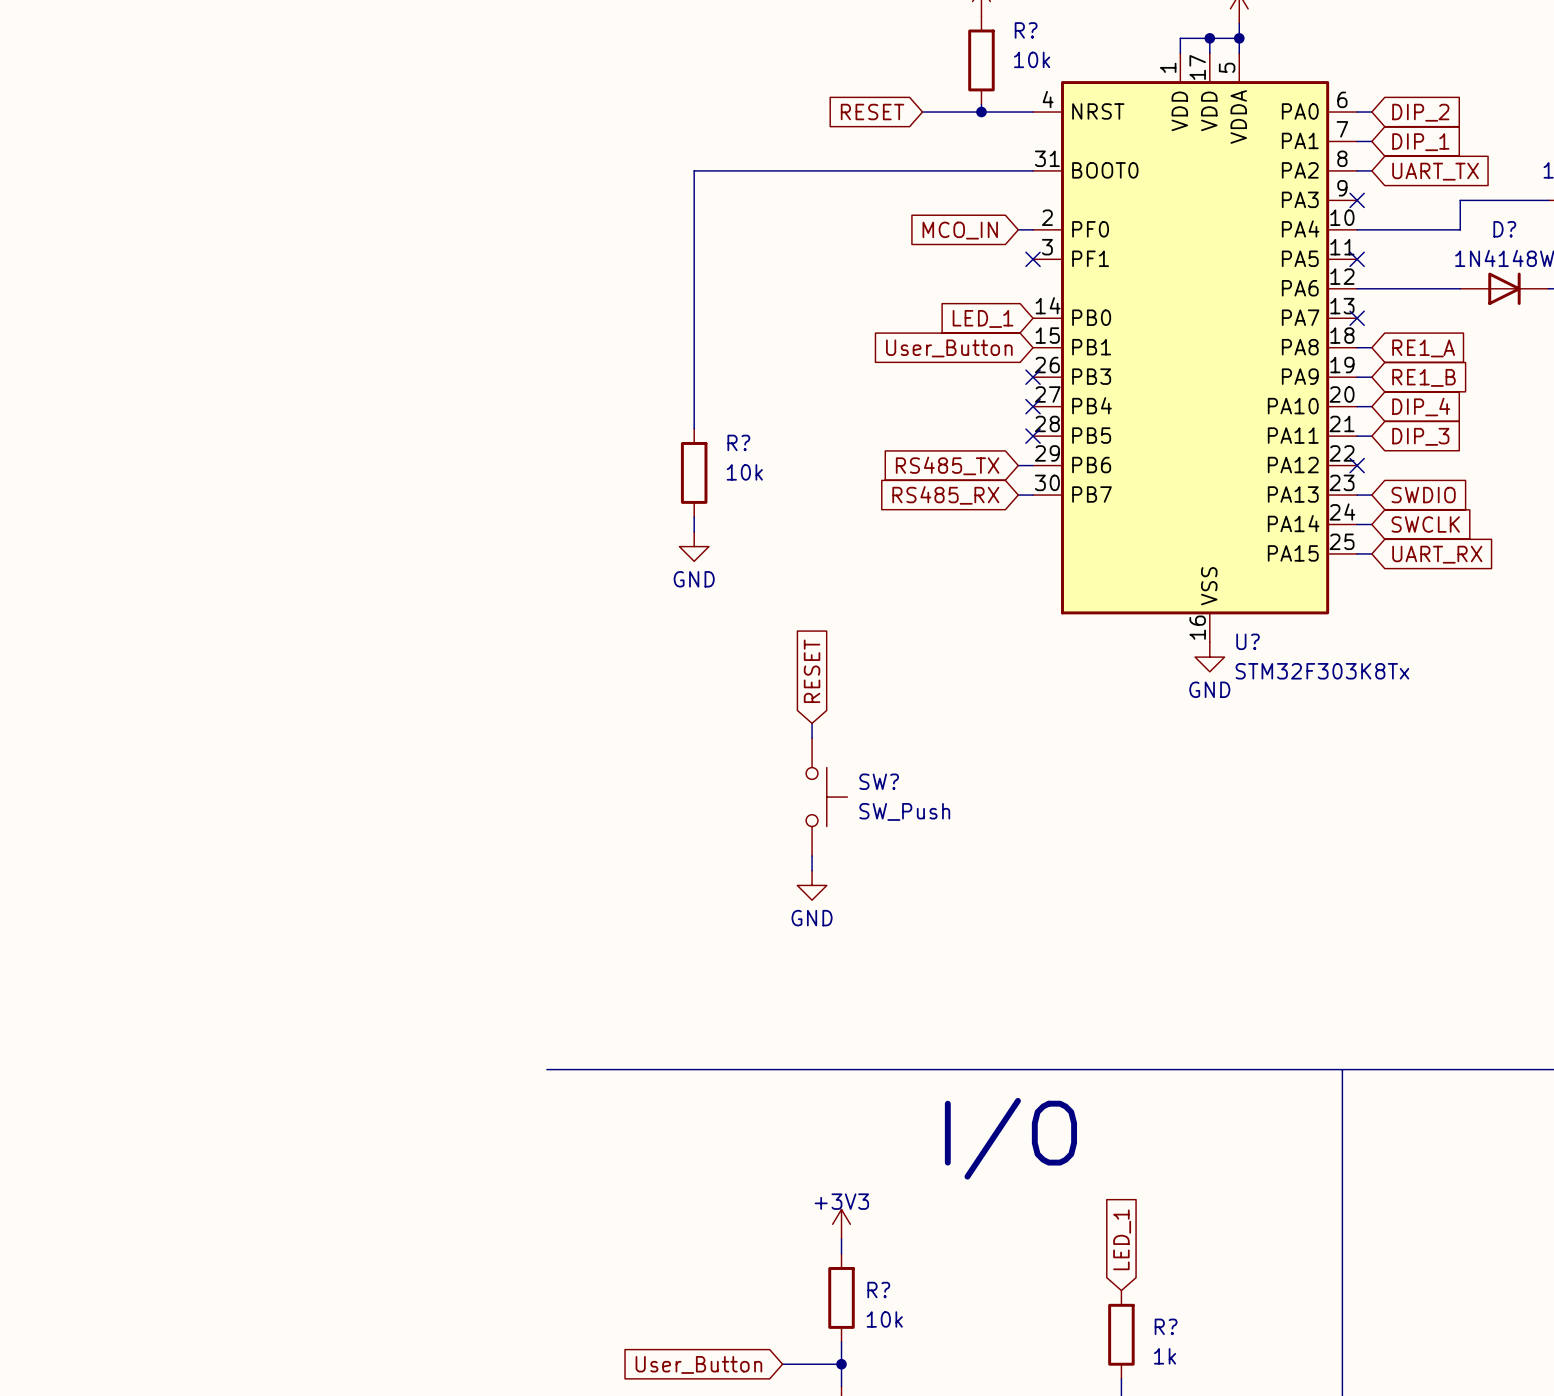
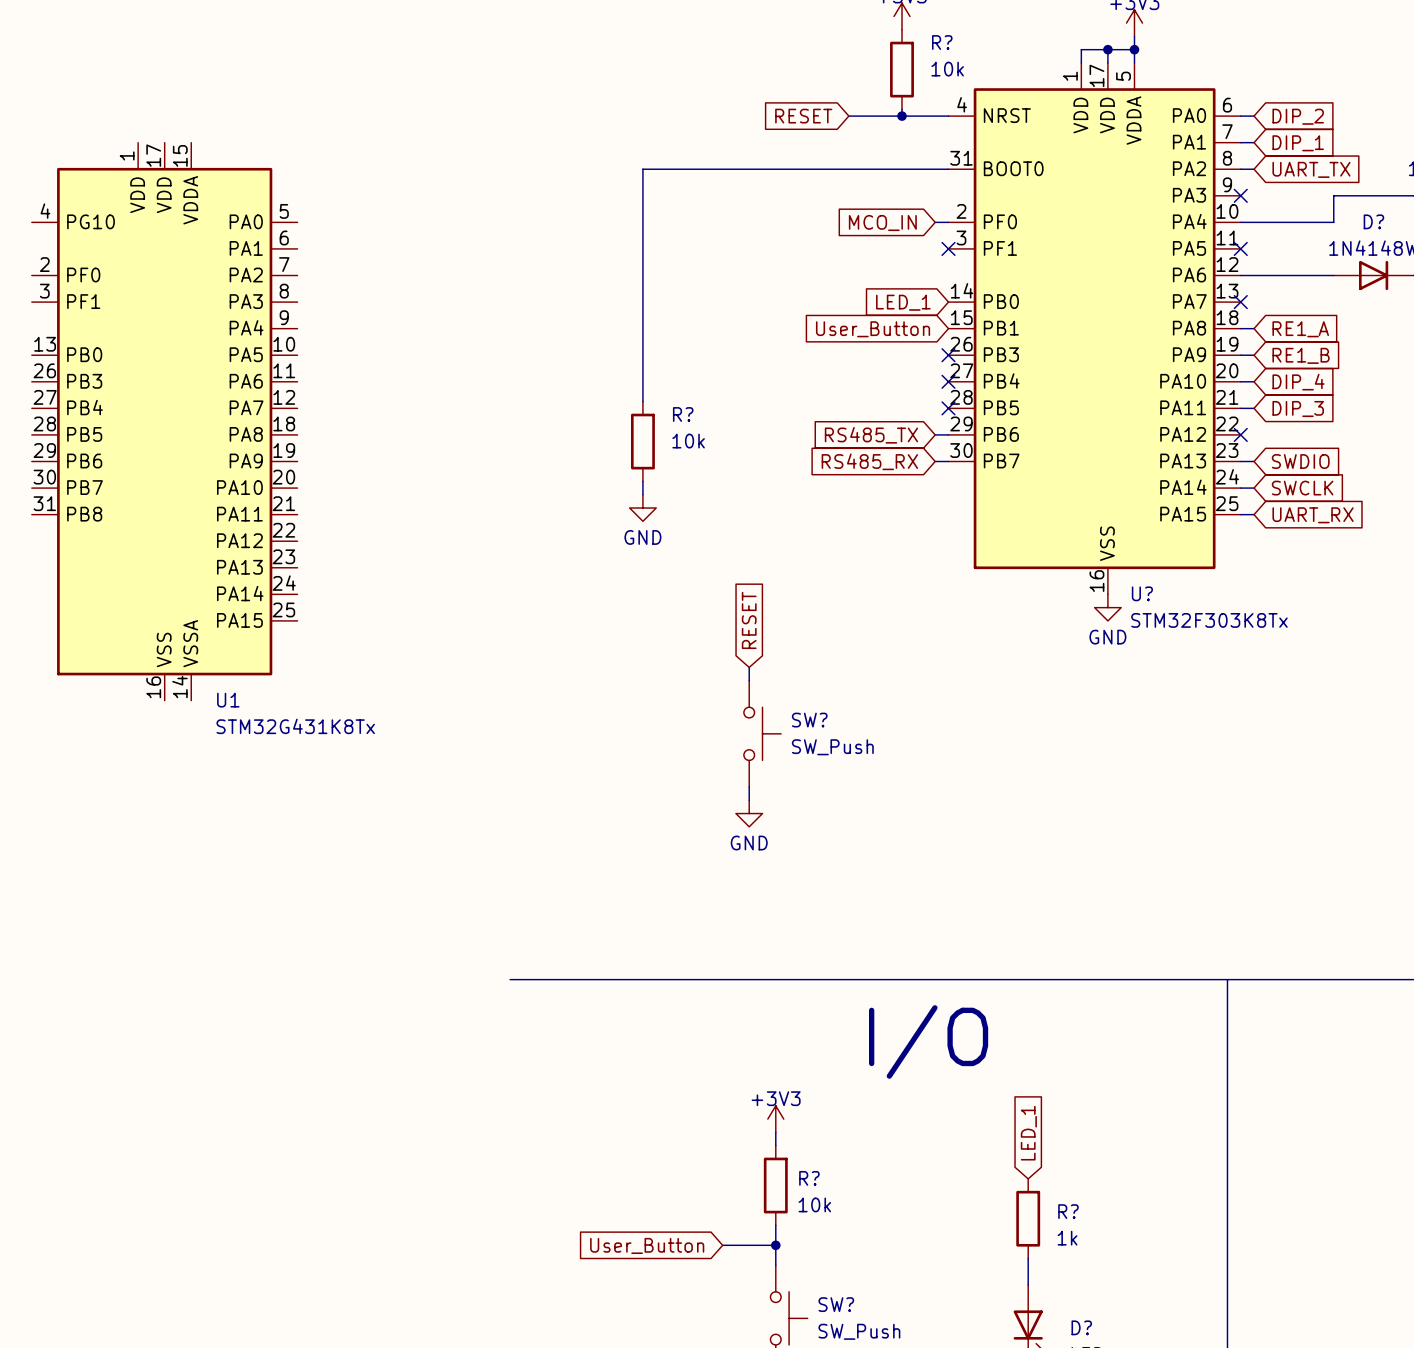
U1: none -> STM32G431K8Tx (164, 421)

